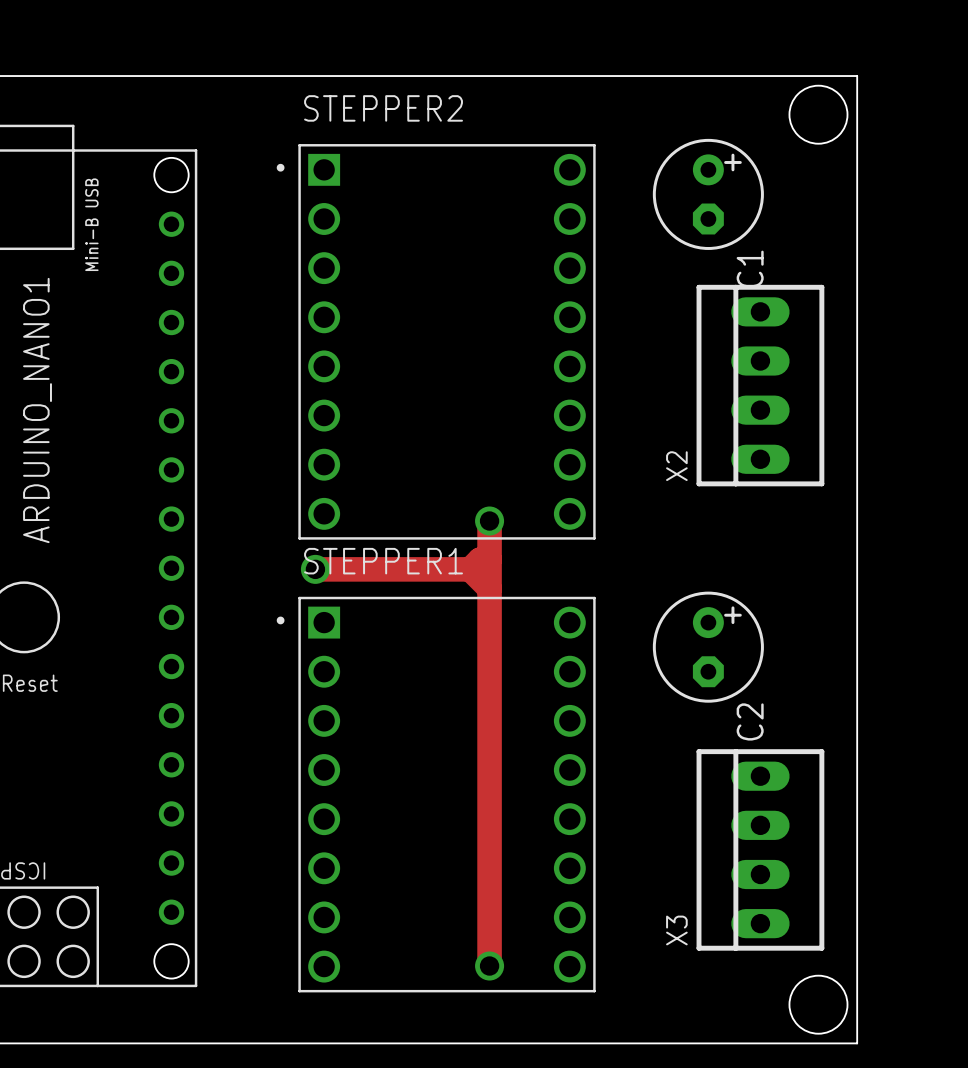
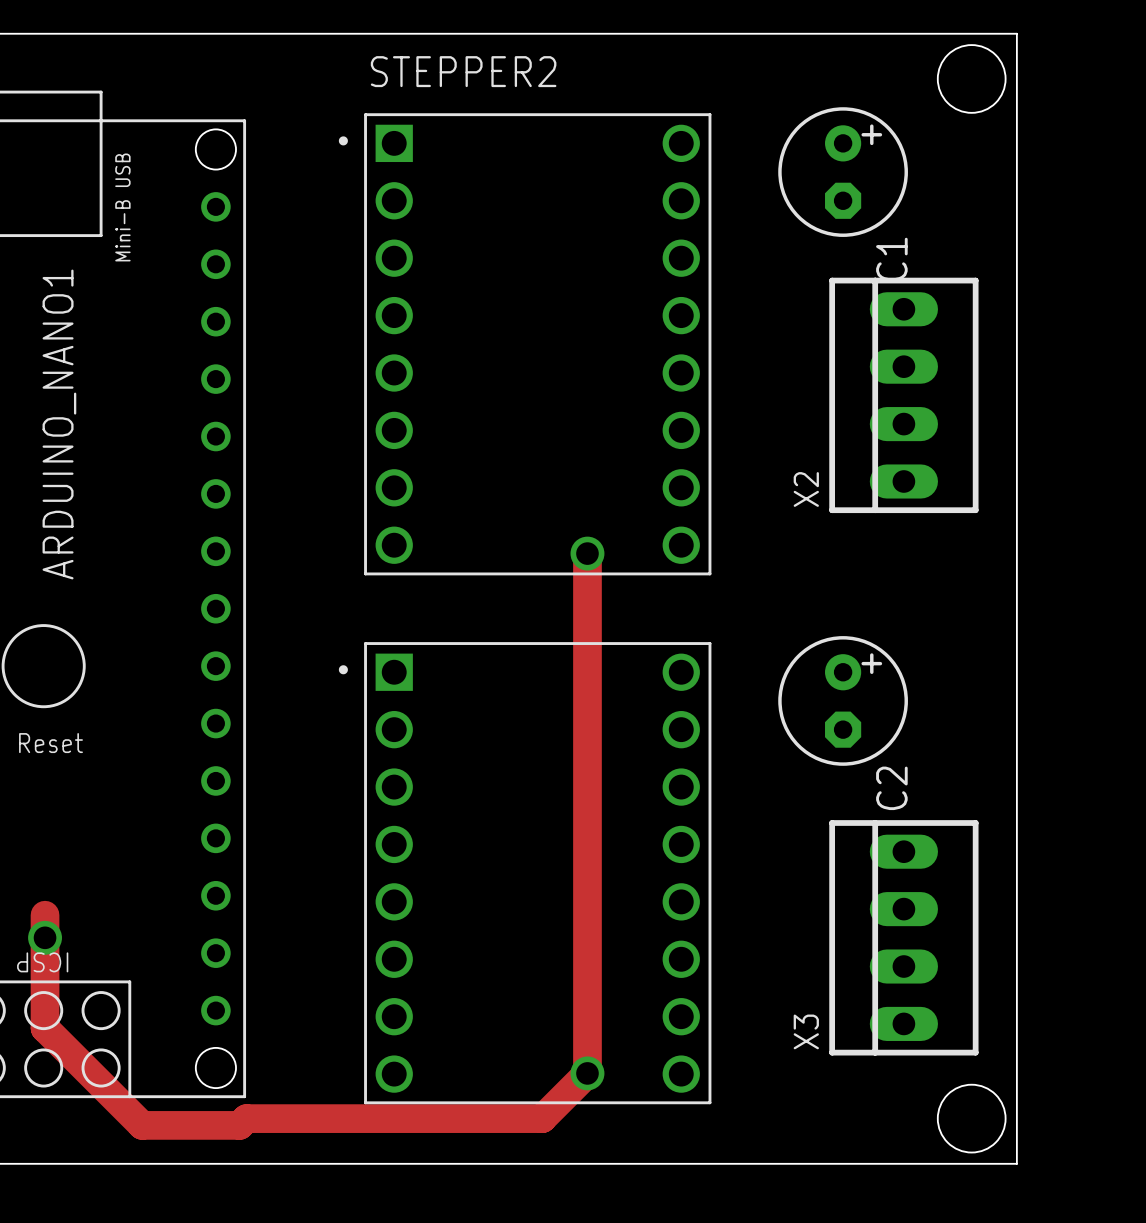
STEPPER1 name: STEPPER1 (383, 561) -> none
track: (315, 569) (479, 569) (489, 559) (479, 559) (470, 569) (489, 588) -> none
via: (315, 569) -> none
track: none -> (45, 915) (45, 1028) (142, 1125) (239, 1125) (246, 1118) (542, 1118) (587, 1073)
via: none -> (45, 937)

